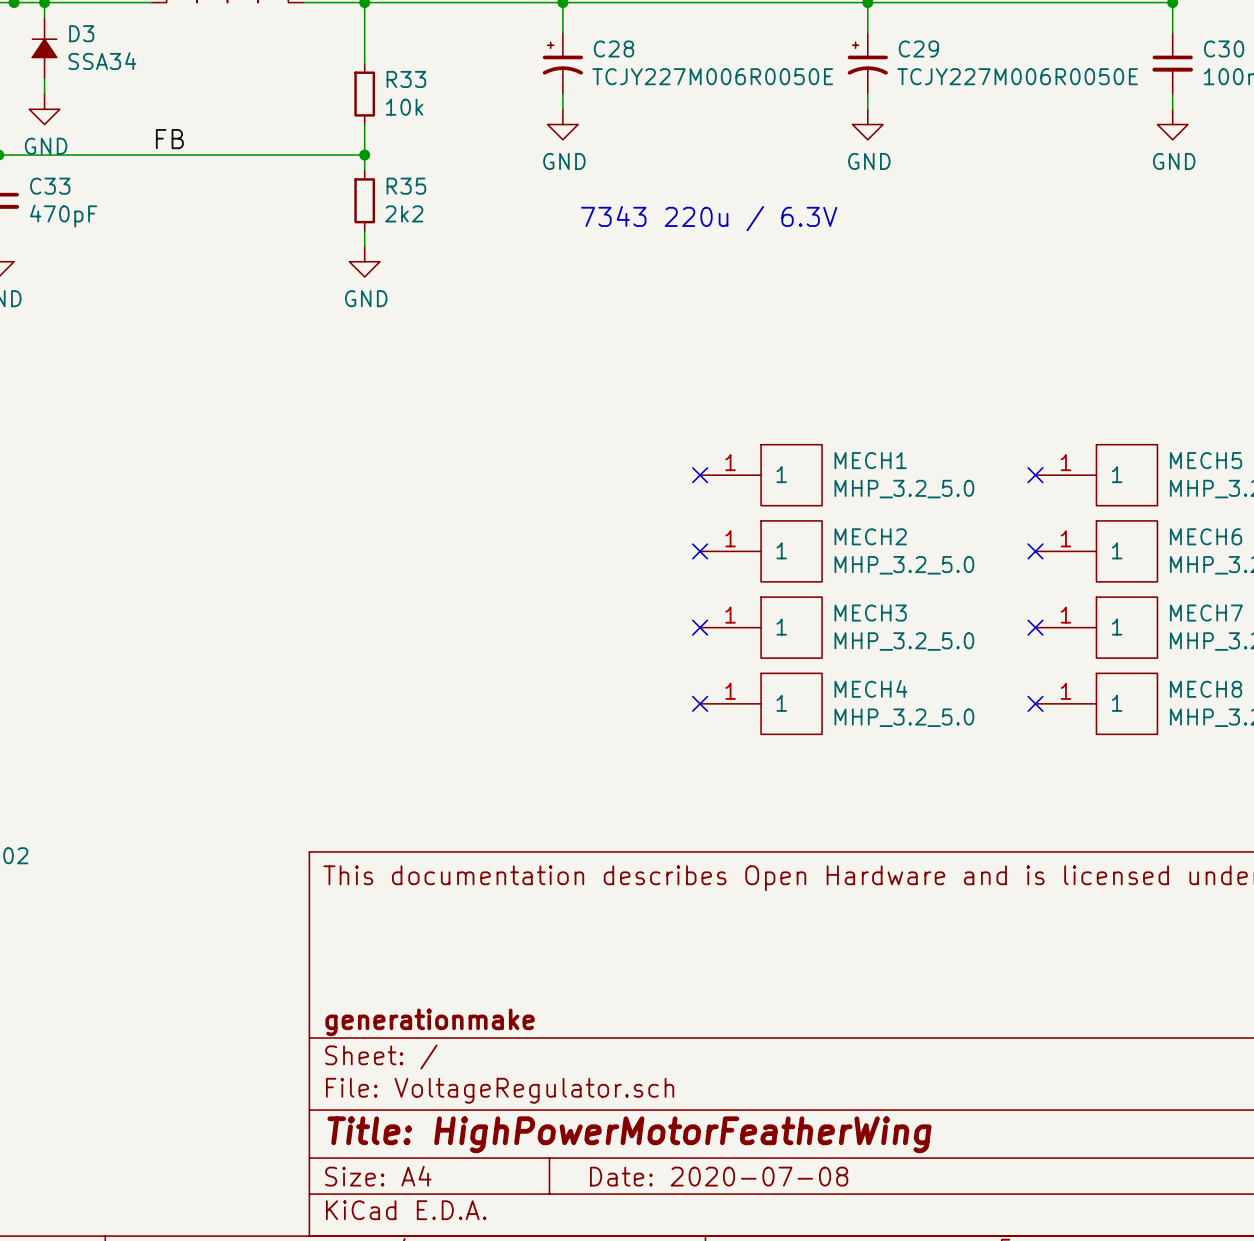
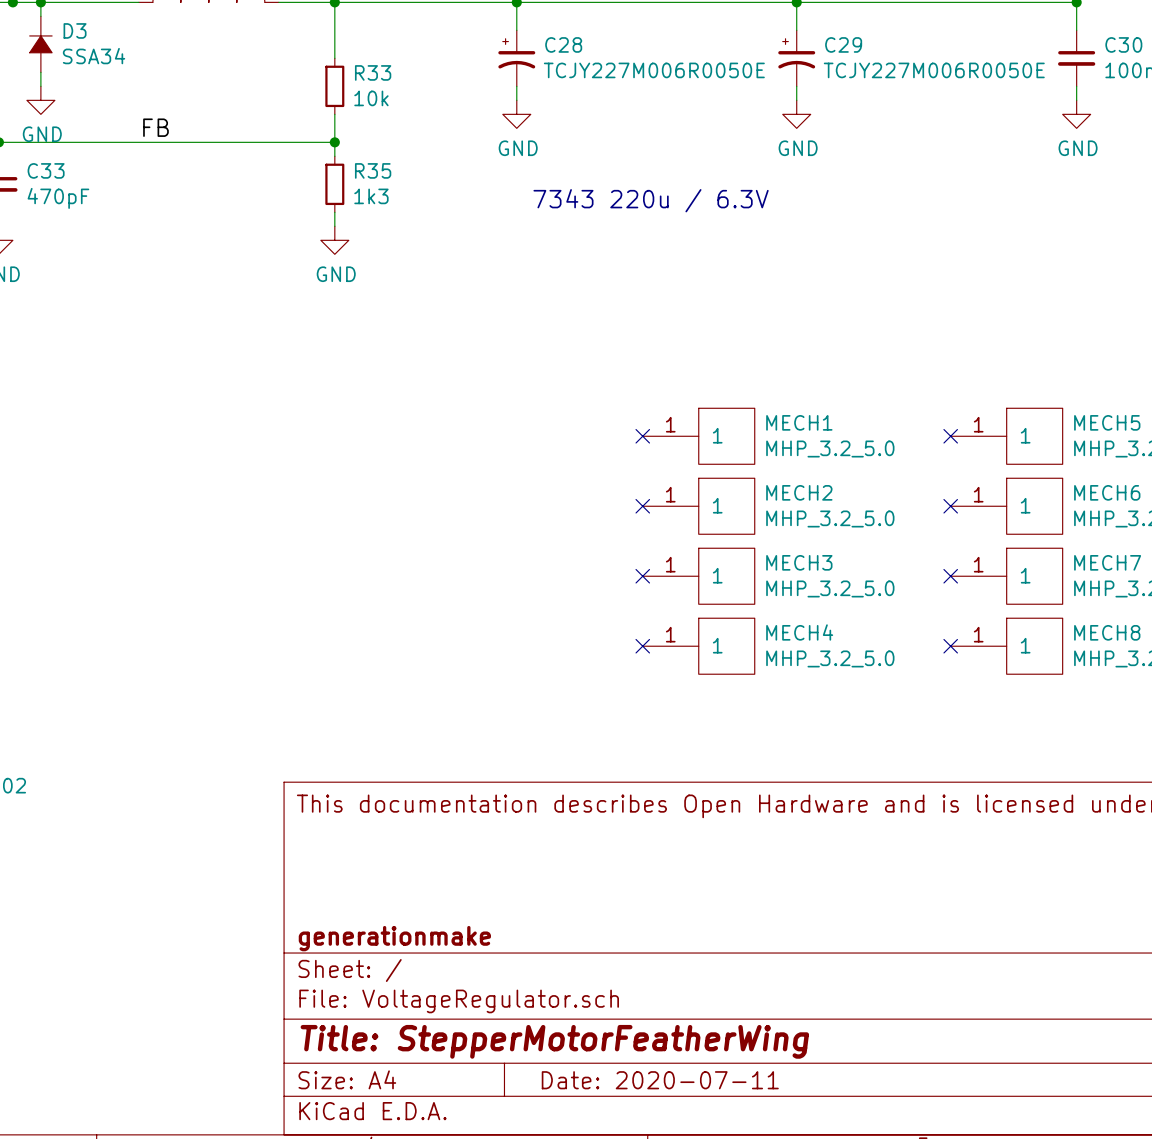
R35 value: 2k2 (404, 213) -> 1k3 (371, 196)
title block: Title: HighPowerMotorFeatherWing (629, 1134) -> Title: StepperMotorFeatherWing (554, 1041)
title block: Date: 2020-07-08 (719, 1176) -> Date: 2020-07-11 (660, 1080)

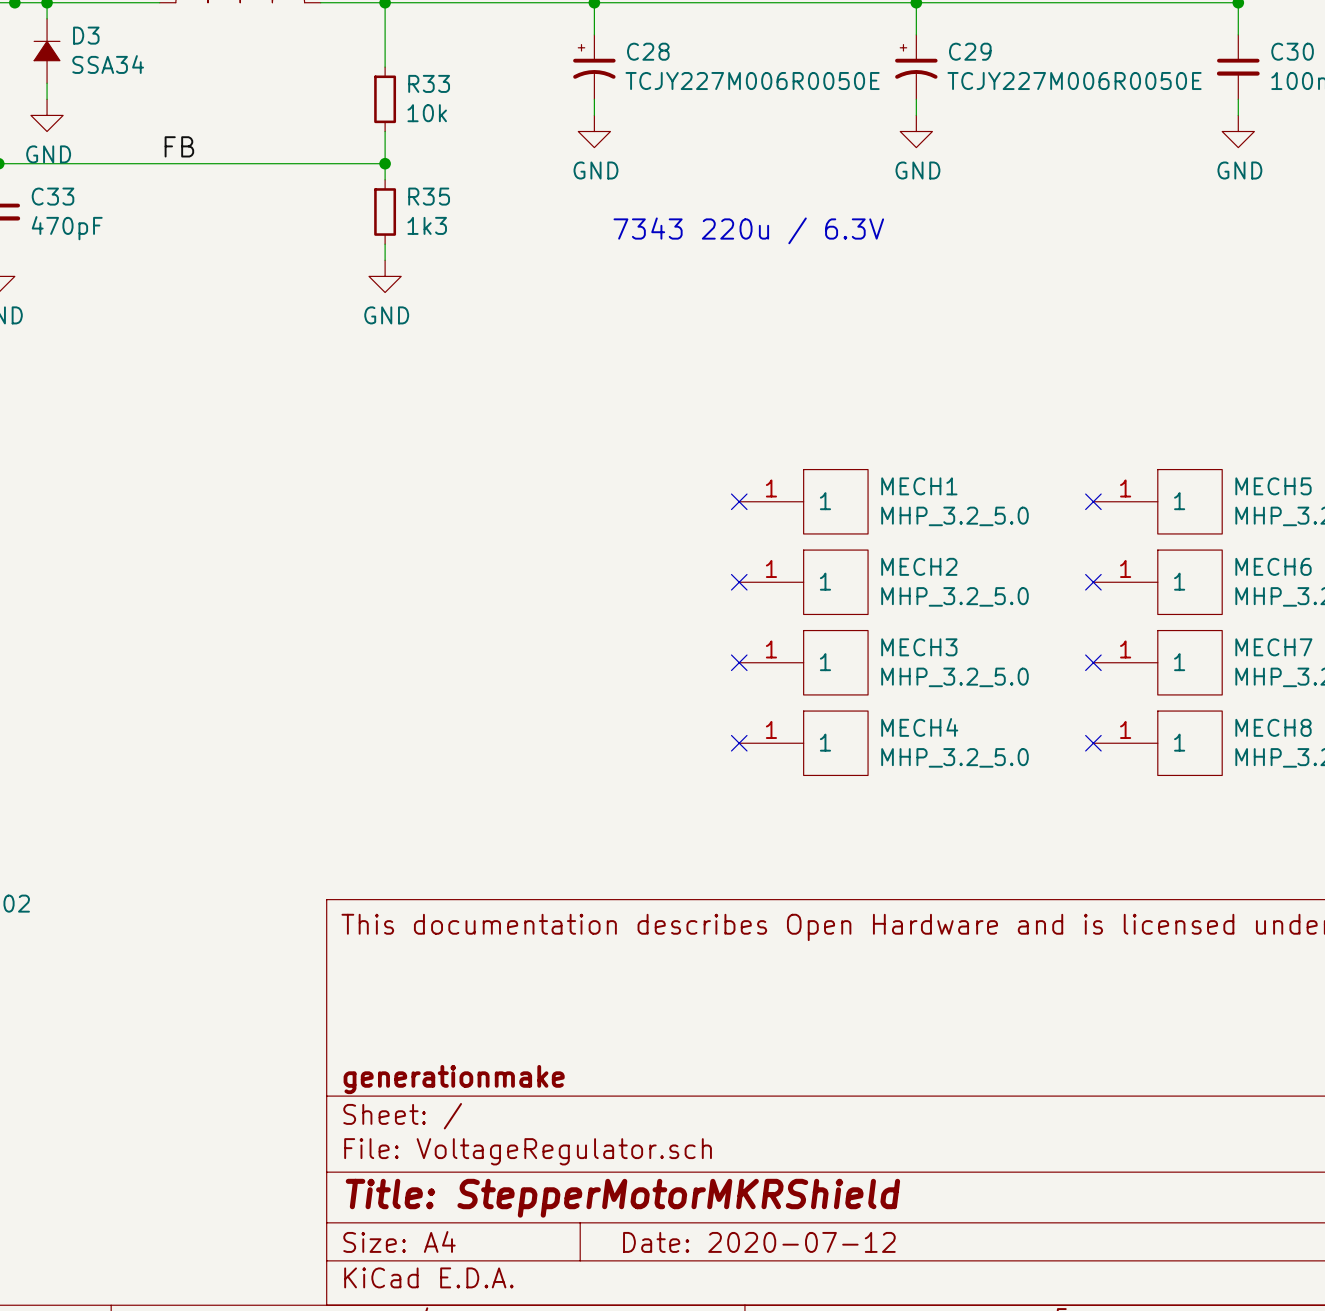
title block: Title: StepperMotorFeatherWing (554, 1041) -> Title: StepperMotorMKRShield (622, 1198)
title block: Date: 2020-07-11 (660, 1080) -> Date: 2020-07-12 (759, 1242)

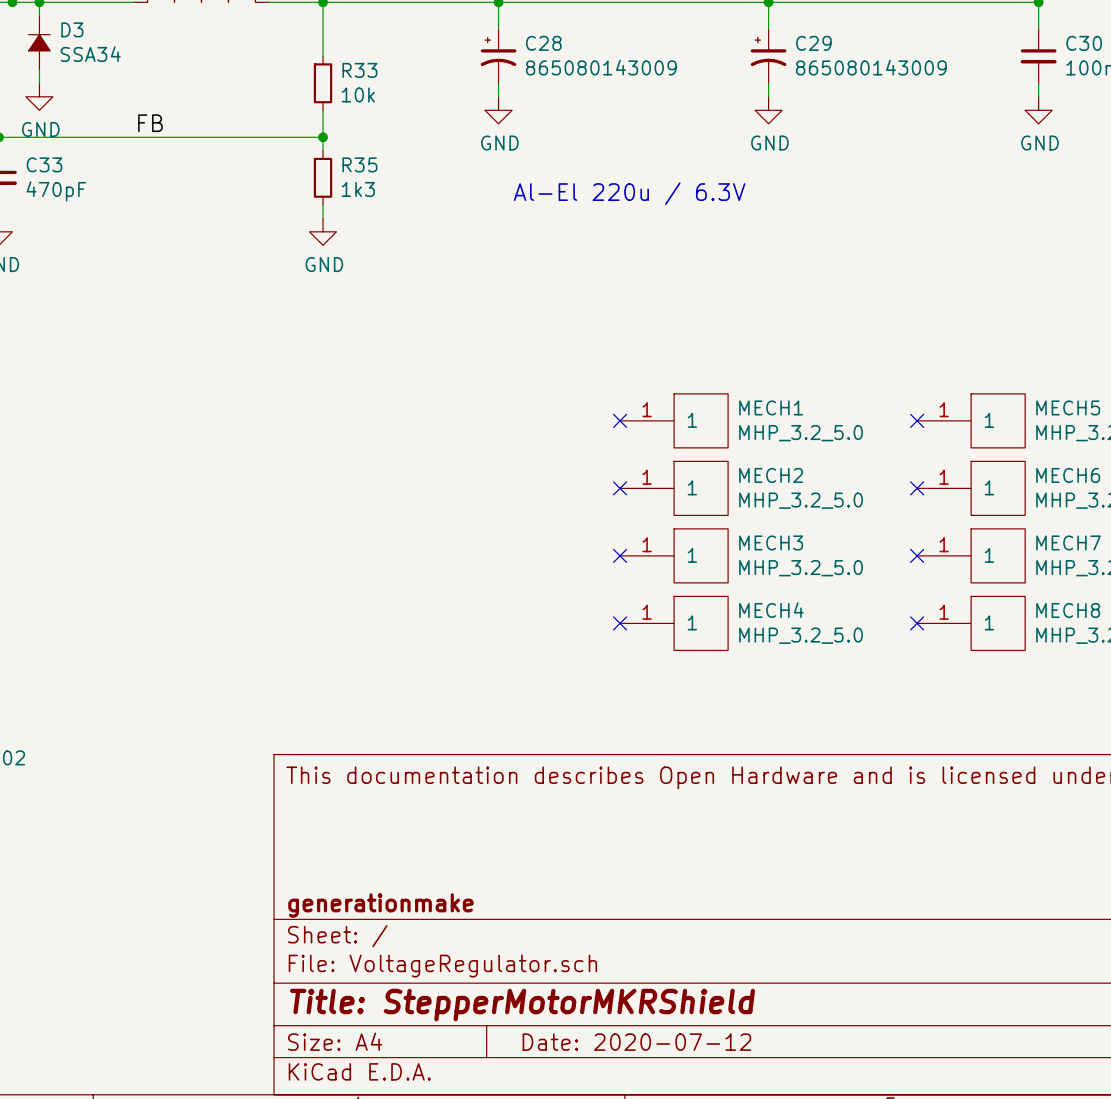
C28 value: TCJY227M006R0050E (752, 81) -> 865080143009 (601, 67)
C29 value: TCJY227M006R0050E (1074, 81) -> 865080143009 (871, 67)
text: 7343 220u / 6.3V (748, 230) -> Al-El 220u / 6.3V (629, 193)

